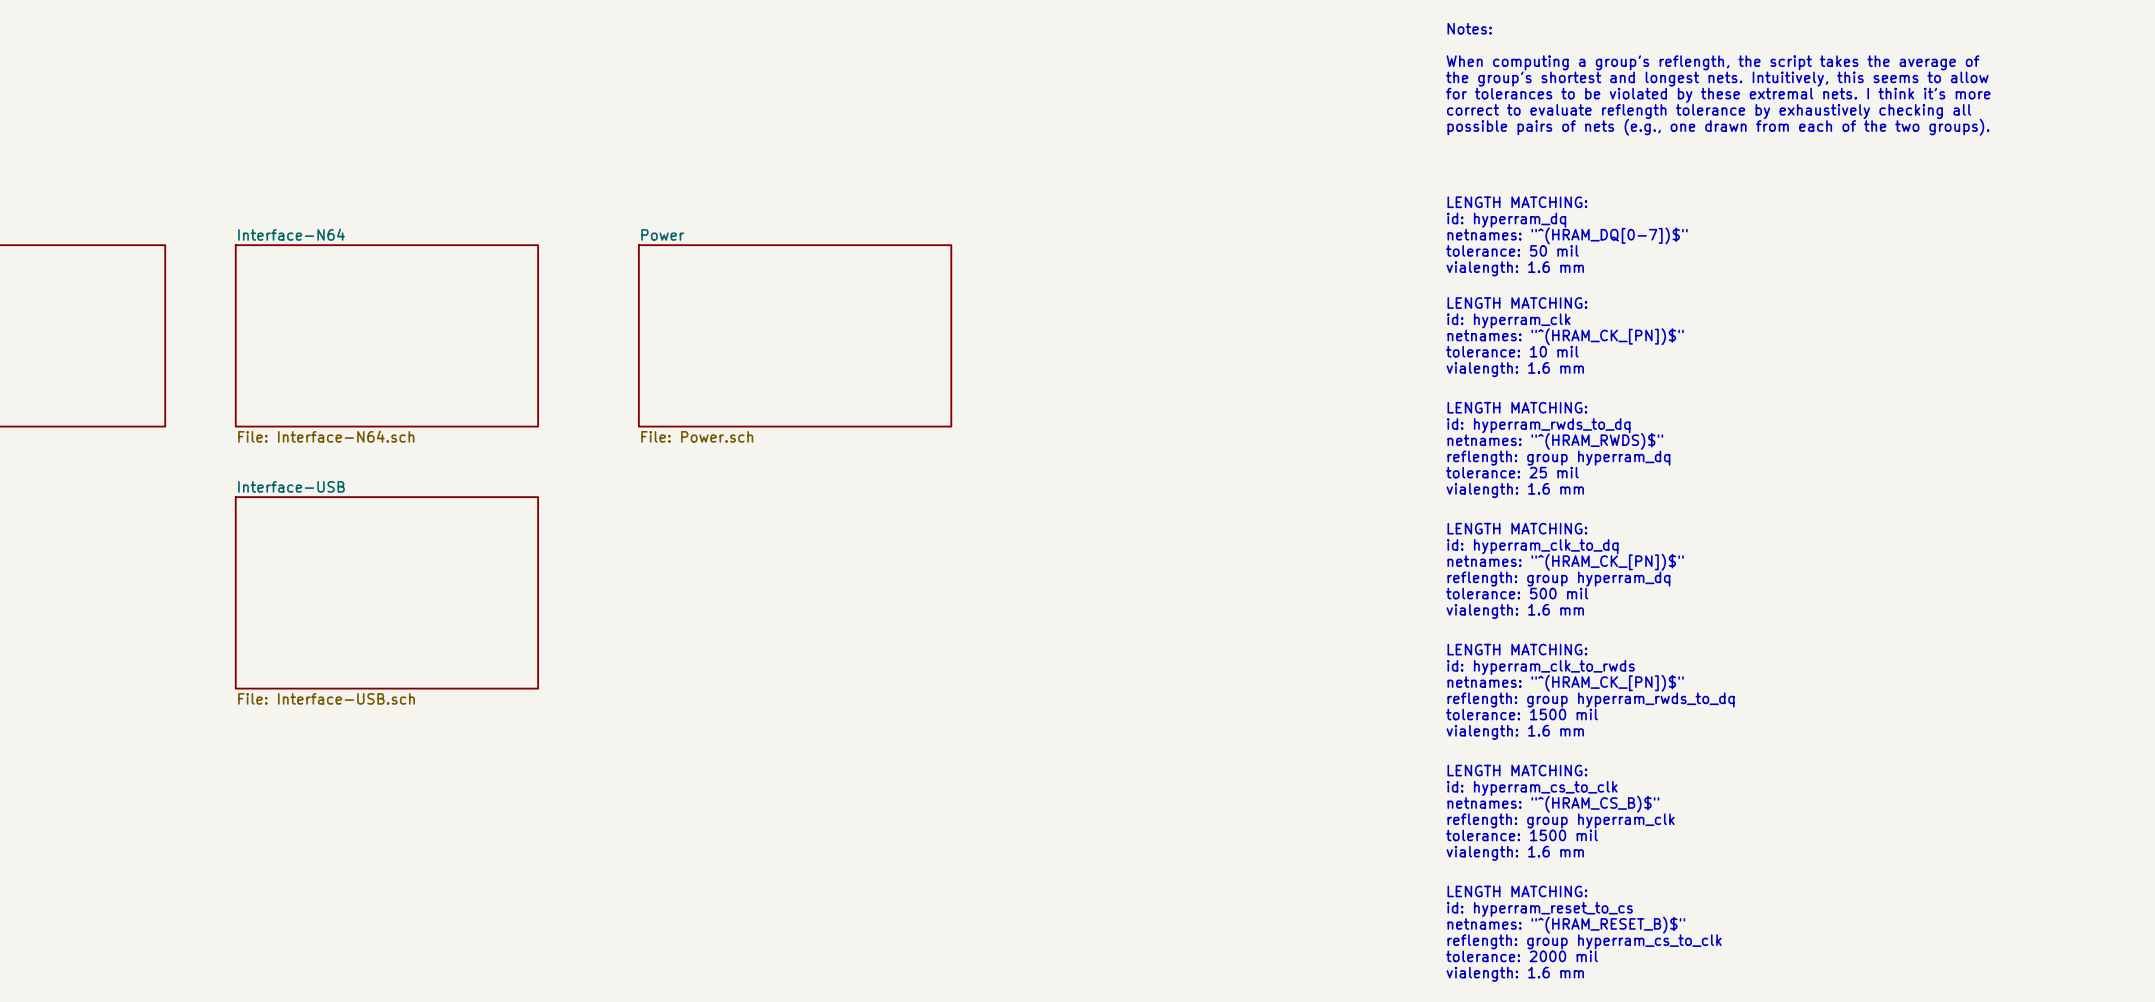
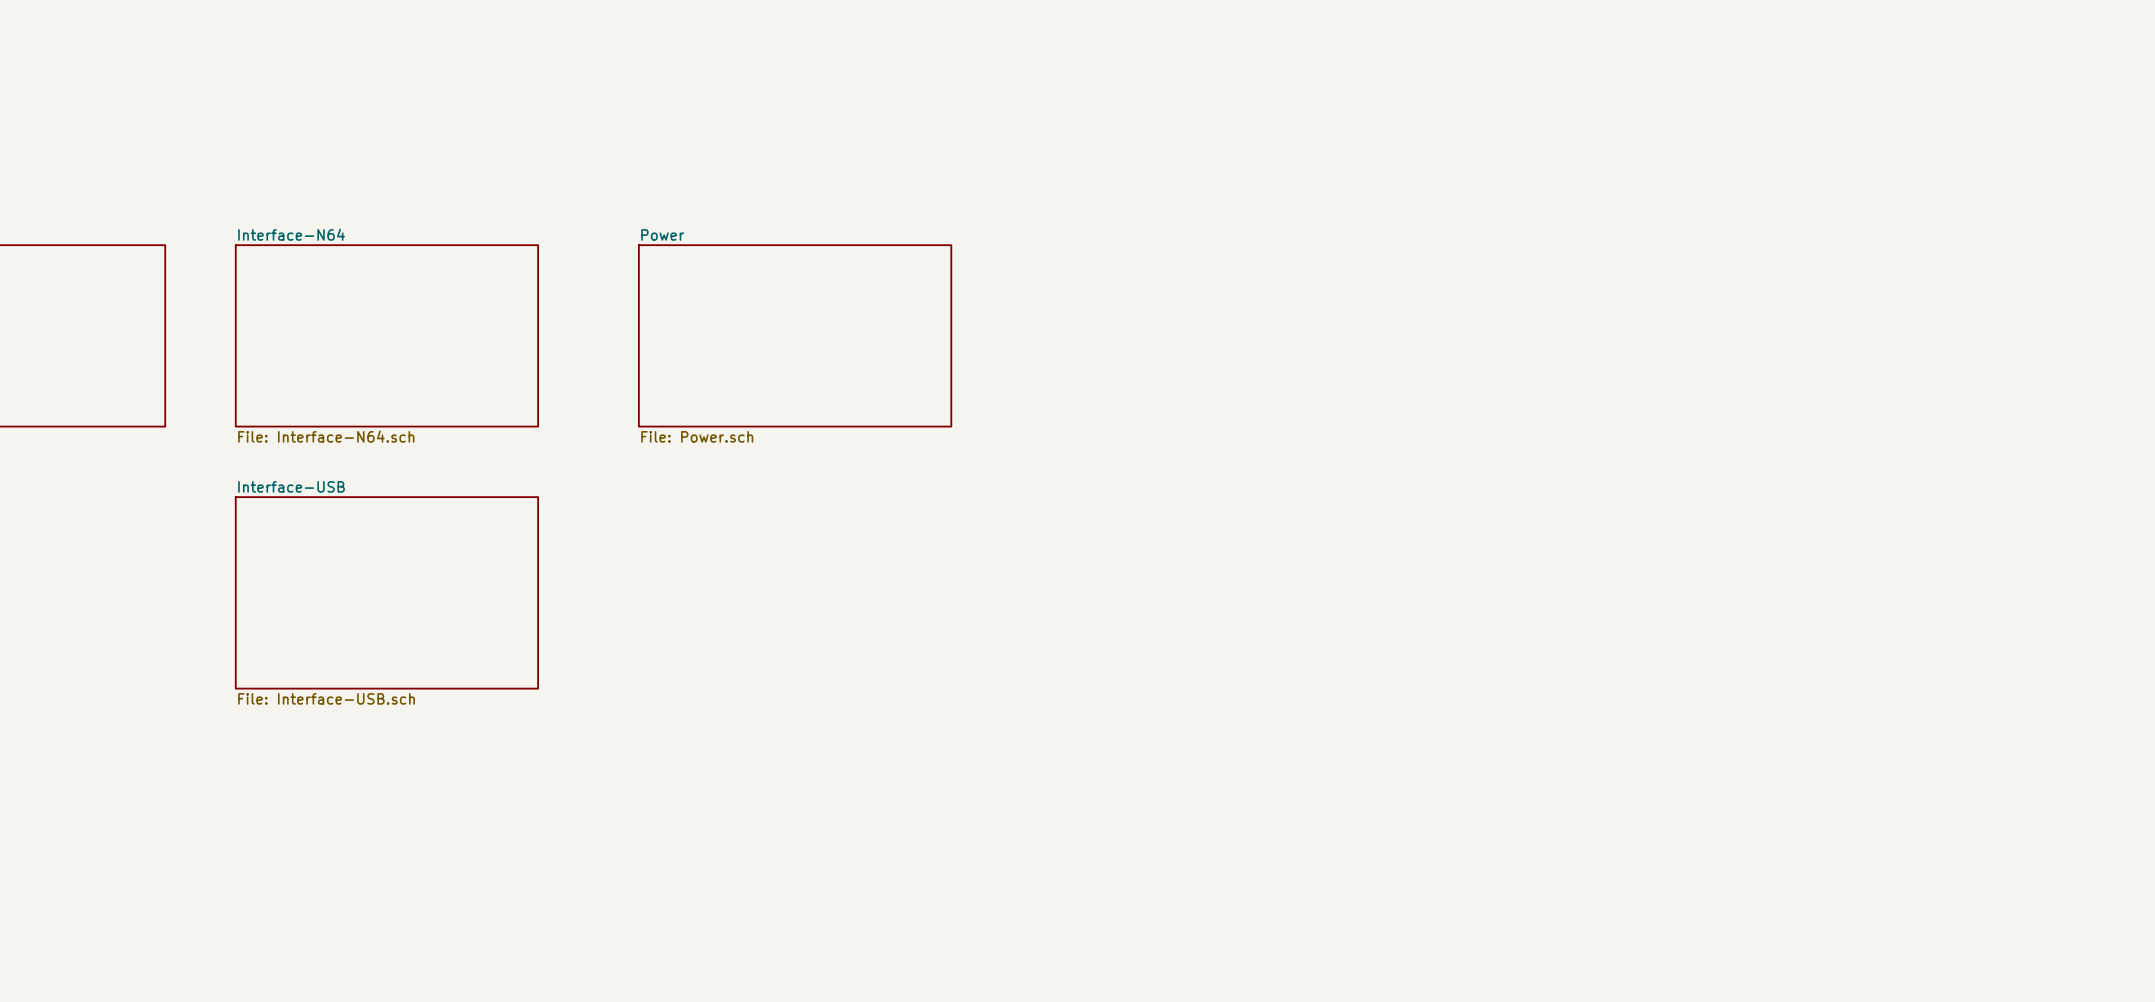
text: Notes: (1469, 28) -> none
text: When computing a group's reflength, the script takes the average of (1712, 62) -> none
text: the group's shortest and longest nets. Intuitively, this seems to allow (1717, 79) -> none
text: for tolerances to be violated by these extremal nets. I think it's more (1718, 95) -> none
text: correct to evaluate reflength tolerance by exhaustively checking all (1709, 111) -> none
text: possible pairs of nets (e.g., one drawn from each of the two groups). (1718, 127) -> none
text: LENGTH MATCHING: (1517, 202) -> none
text: id: hyperram_dq (1506, 220) -> none
text: netnames: "^(HRAM_DQ[0-7])$" (1567, 235) -> none
text: tolerance: 50 mil (1512, 250) -> none
text: vialength: 1.6 mm (1515, 268) -> none
text: LENGTH MATCHING: (1517, 303) -> none
text: id: hyperram_clk (1508, 320) -> none
text: netnames: "^(HRAM_CK_[PN])$" (1565, 336) -> none
text: tolerance: 10 mil (1512, 351) -> none
text: vialength: 1.6 mm (1515, 369) -> none
text: LENGTH MATCHING: (1517, 407) -> none
text: id: hyperram_rwds_to_dq (1538, 425) -> none
text: netnames: "^(HRAM_RWDS)$" (1555, 441) -> none
text: reflength: group hyperram_dq (1558, 458) -> none
text: tolerance: 25 mil (1512, 472) -> none
text: vialength: 1.6 mm (1515, 490) -> none
text: LENGTH MATCHING: (1517, 528) -> none
text: id: hyperram_clk_to_dq (1532, 546) -> none
text: netnames: "^(HRAM_CK_[PN])$" (1565, 562) -> none
text: reflength: group hyperram_dq (1558, 579) -> none
text: tolerance: 500 mil (1517, 593) -> none
text: vialength: 1.6 mm (1515, 611) -> none
text: LENGTH MATCHING: (1517, 649) -> none
text: id: hyperram_clk_to_rwds (1540, 667) -> none
text: netnames: "^(HRAM_CK_[PN])$" (1565, 683) -> none
text: reflength: group hyperram_rwds_to_dq (1591, 699) -> none
text: tolerance: 1500 mil (1521, 714) -> none
text: vialength: 1.6 mm (1515, 732) -> none
text: LENGTH MATCHING: (1517, 770) -> none
text: id: hyperram_cs_to_clk (1532, 788) -> none
text: netnames: "^(HRAM_CS_B)$" (1553, 804) -> none
text: reflength: group hyperram_clk (1561, 820) -> none
text: tolerance: 1500 mil (1521, 835) -> none
text: vialength: 1.6 mm (1515, 853) -> none
text: LENGTH MATCHING: (1517, 891) -> none
text: id: hyperram_reset_to_cs (1539, 909) -> none
text: netnames: "^(HRAM_RESET_B)$" (1566, 925) -> none
text: reflength: group hyperram_cs_to_clk (1584, 941) -> none
text: tolerance: 2000 mil (1521, 956) -> none
text: vialength: 1.6 mm (1515, 974) -> none

